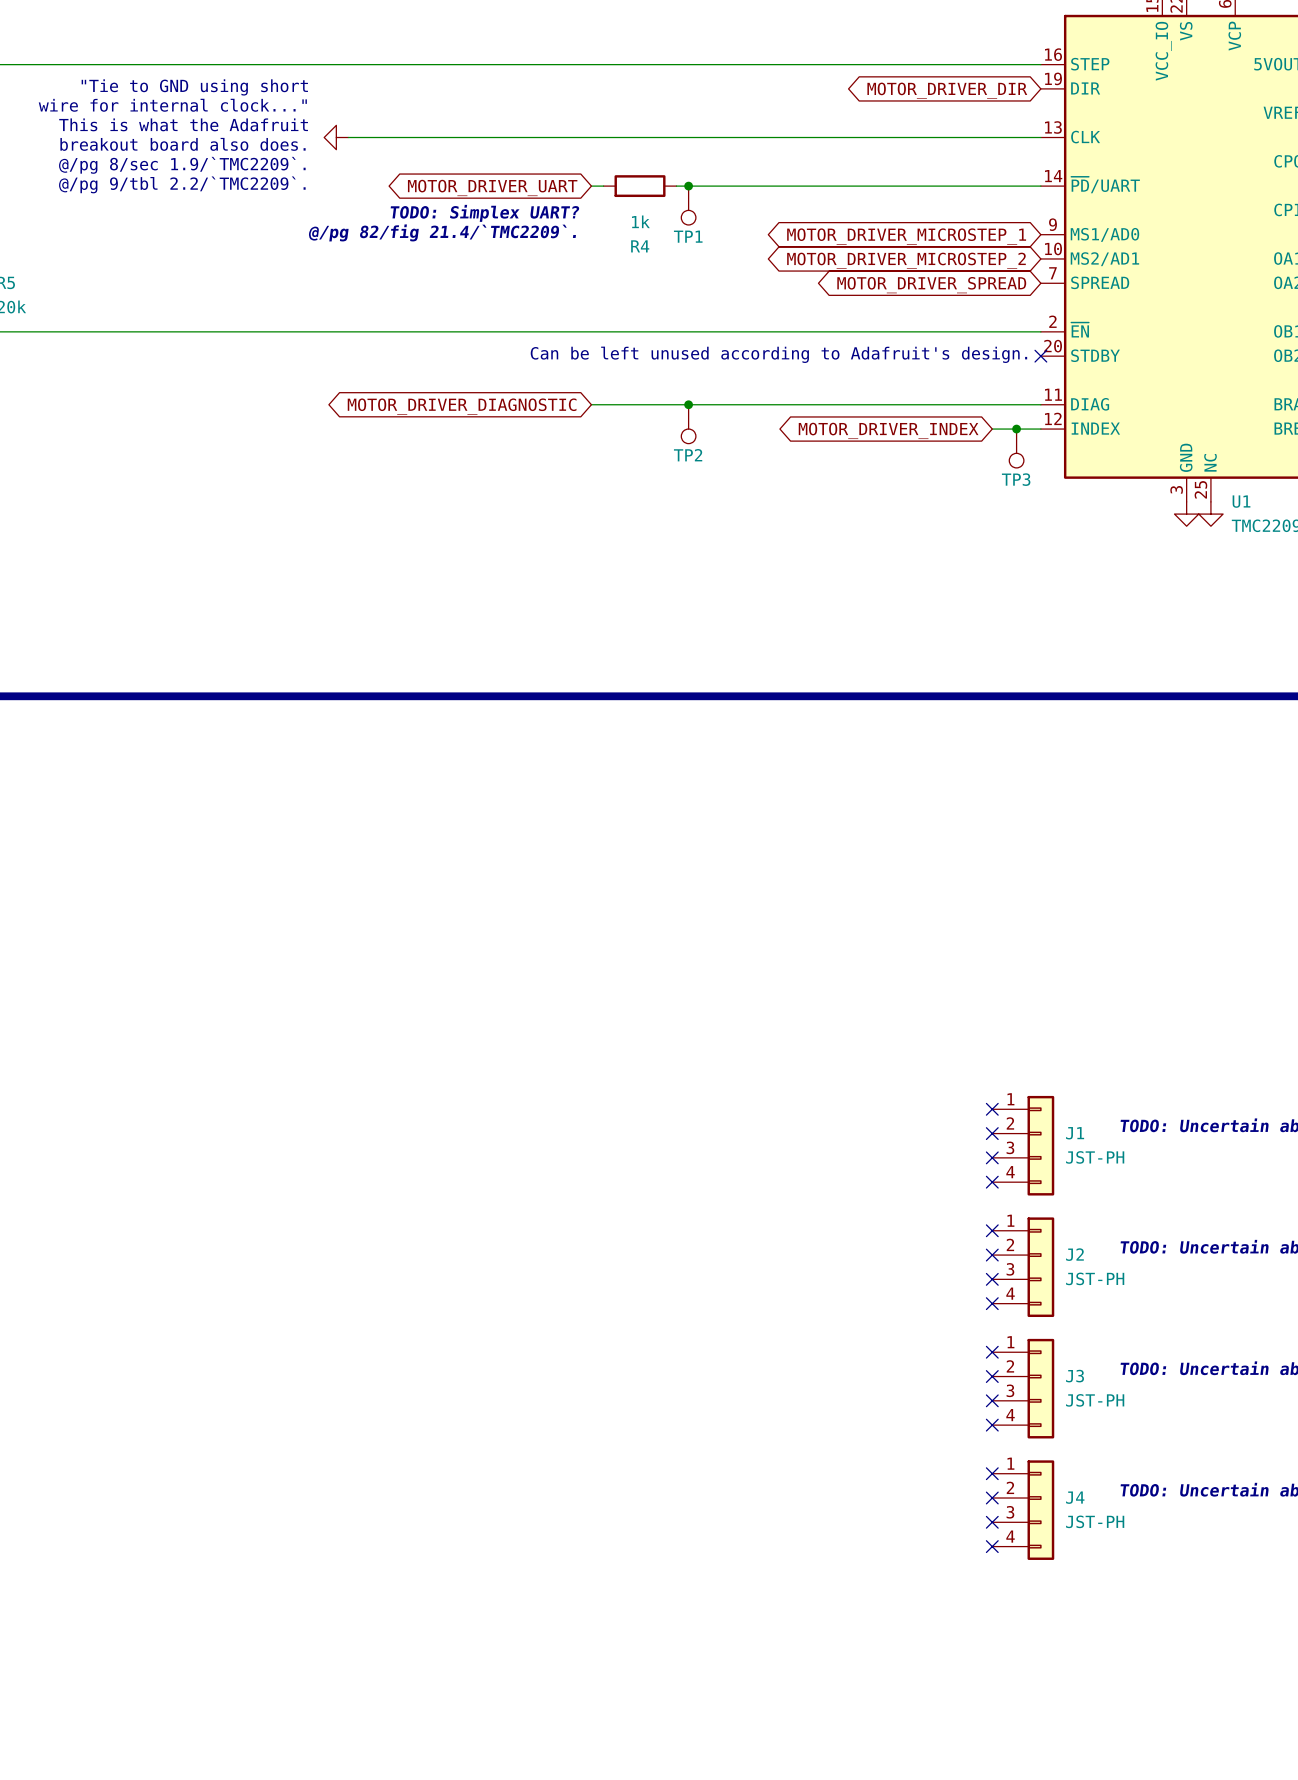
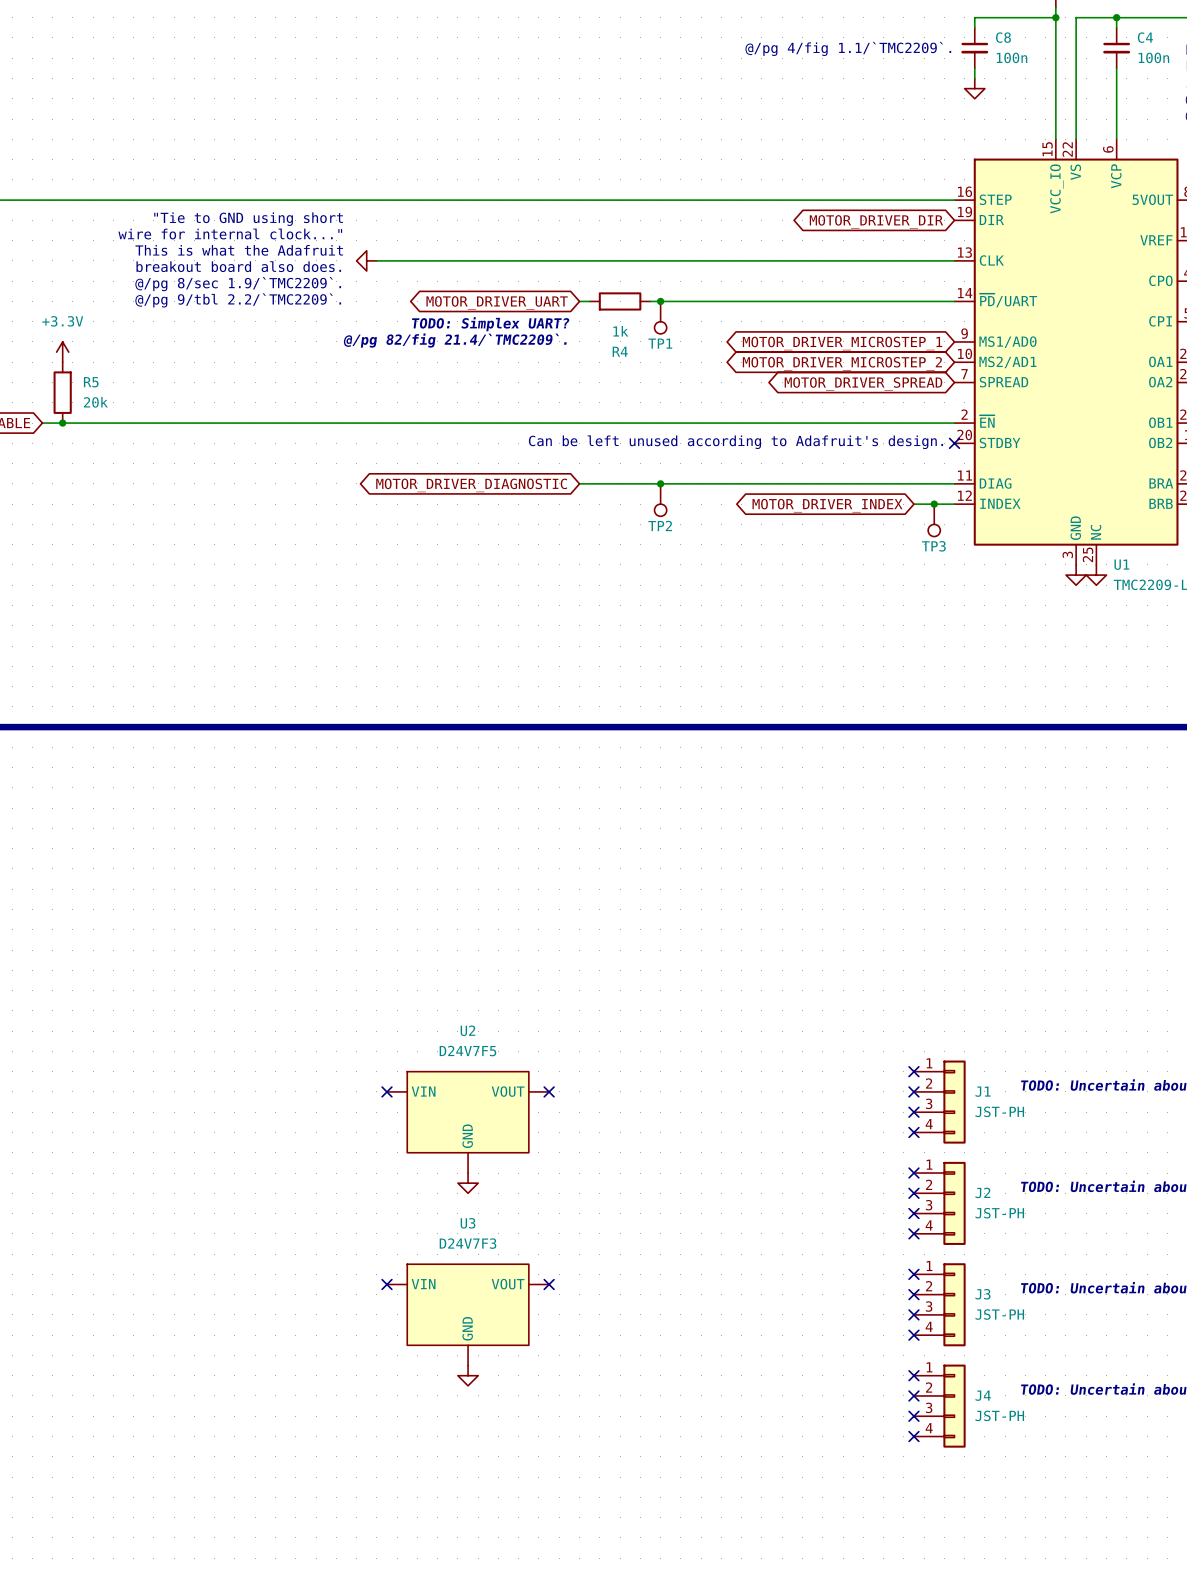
no-connect mark: none -> (386, 1091)
no-connect mark: none -> (549, 1091)
U2: none -> D24V7F5 (468, 1122)
power symbol: none -> (468, 1183)
no-connect mark: none -> (386, 1284)
no-connect mark: none -> (549, 1284)
U3: none -> D24V7F3 (468, 1314)
power symbol: none -> (468, 1375)

